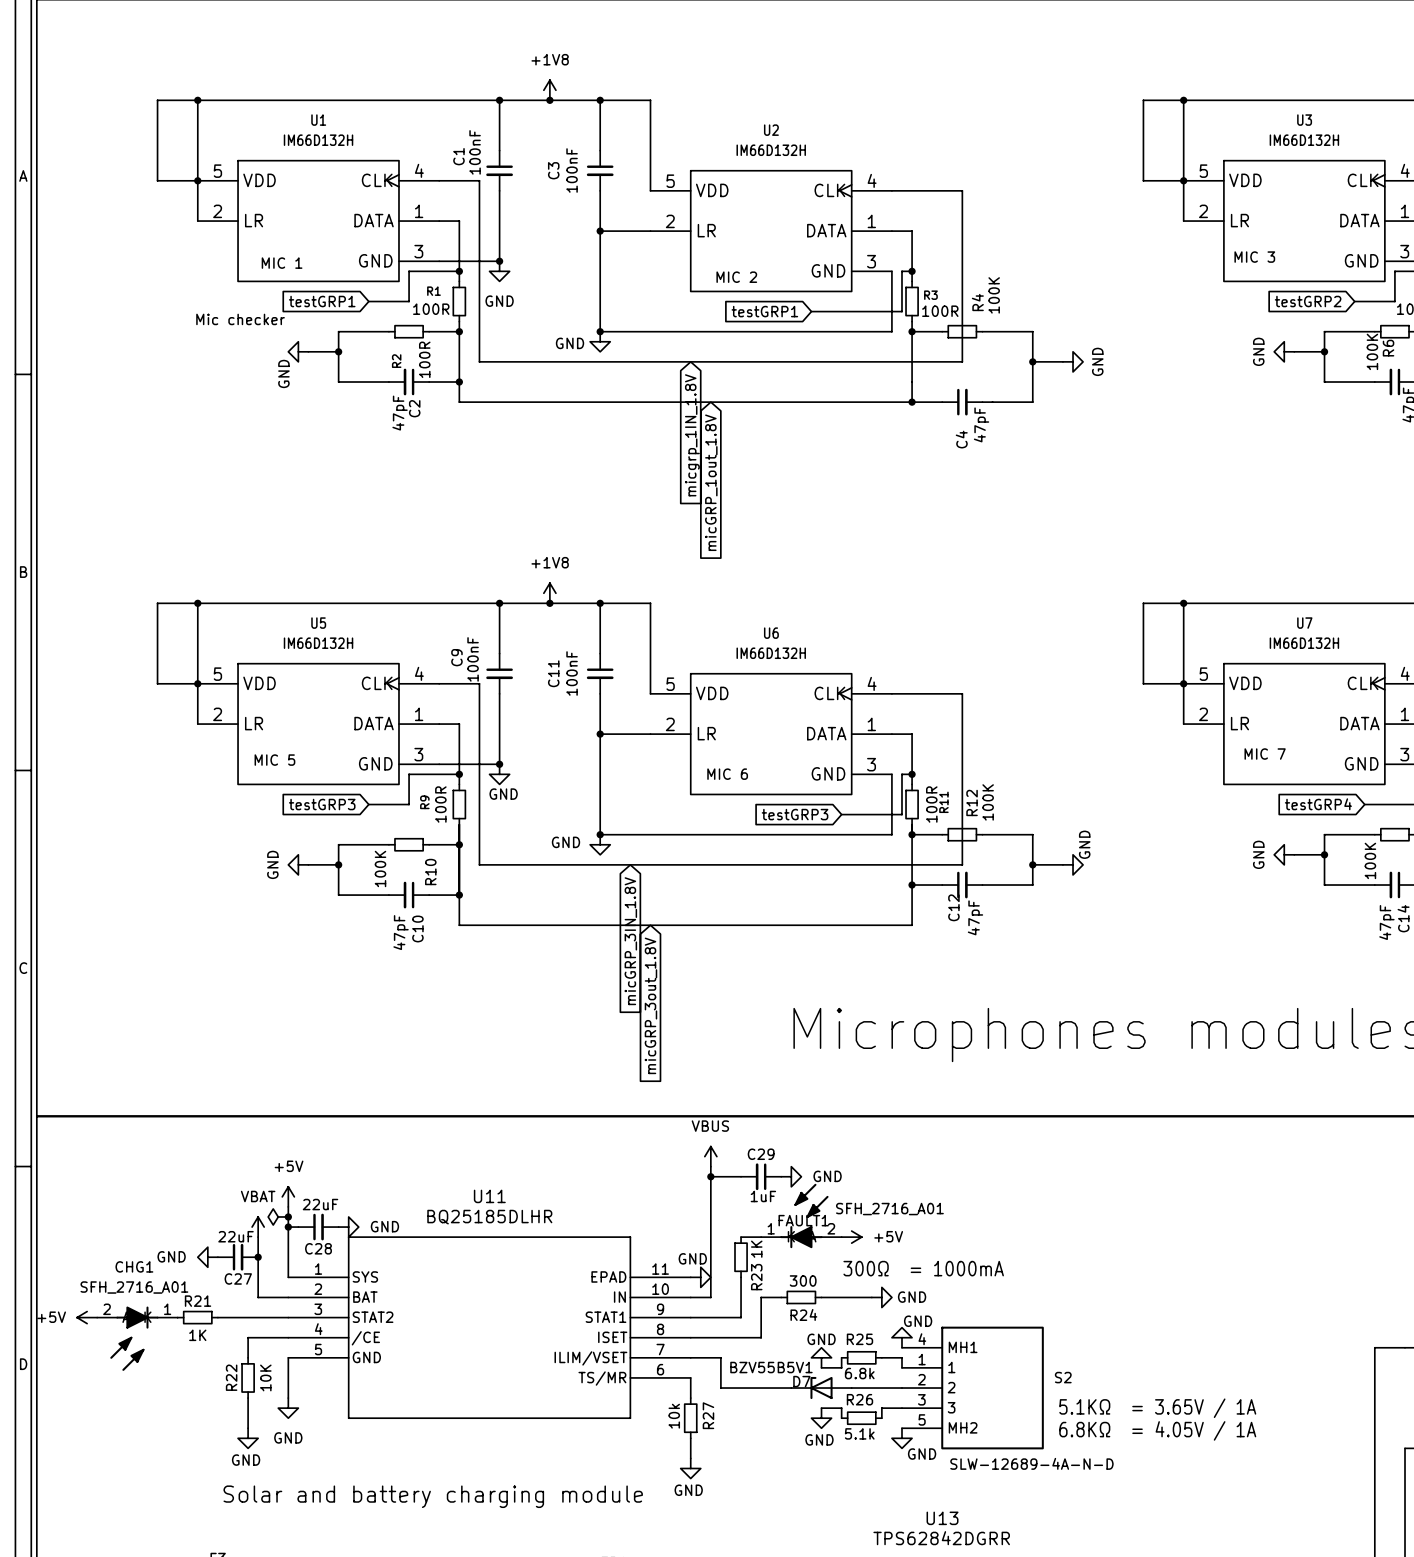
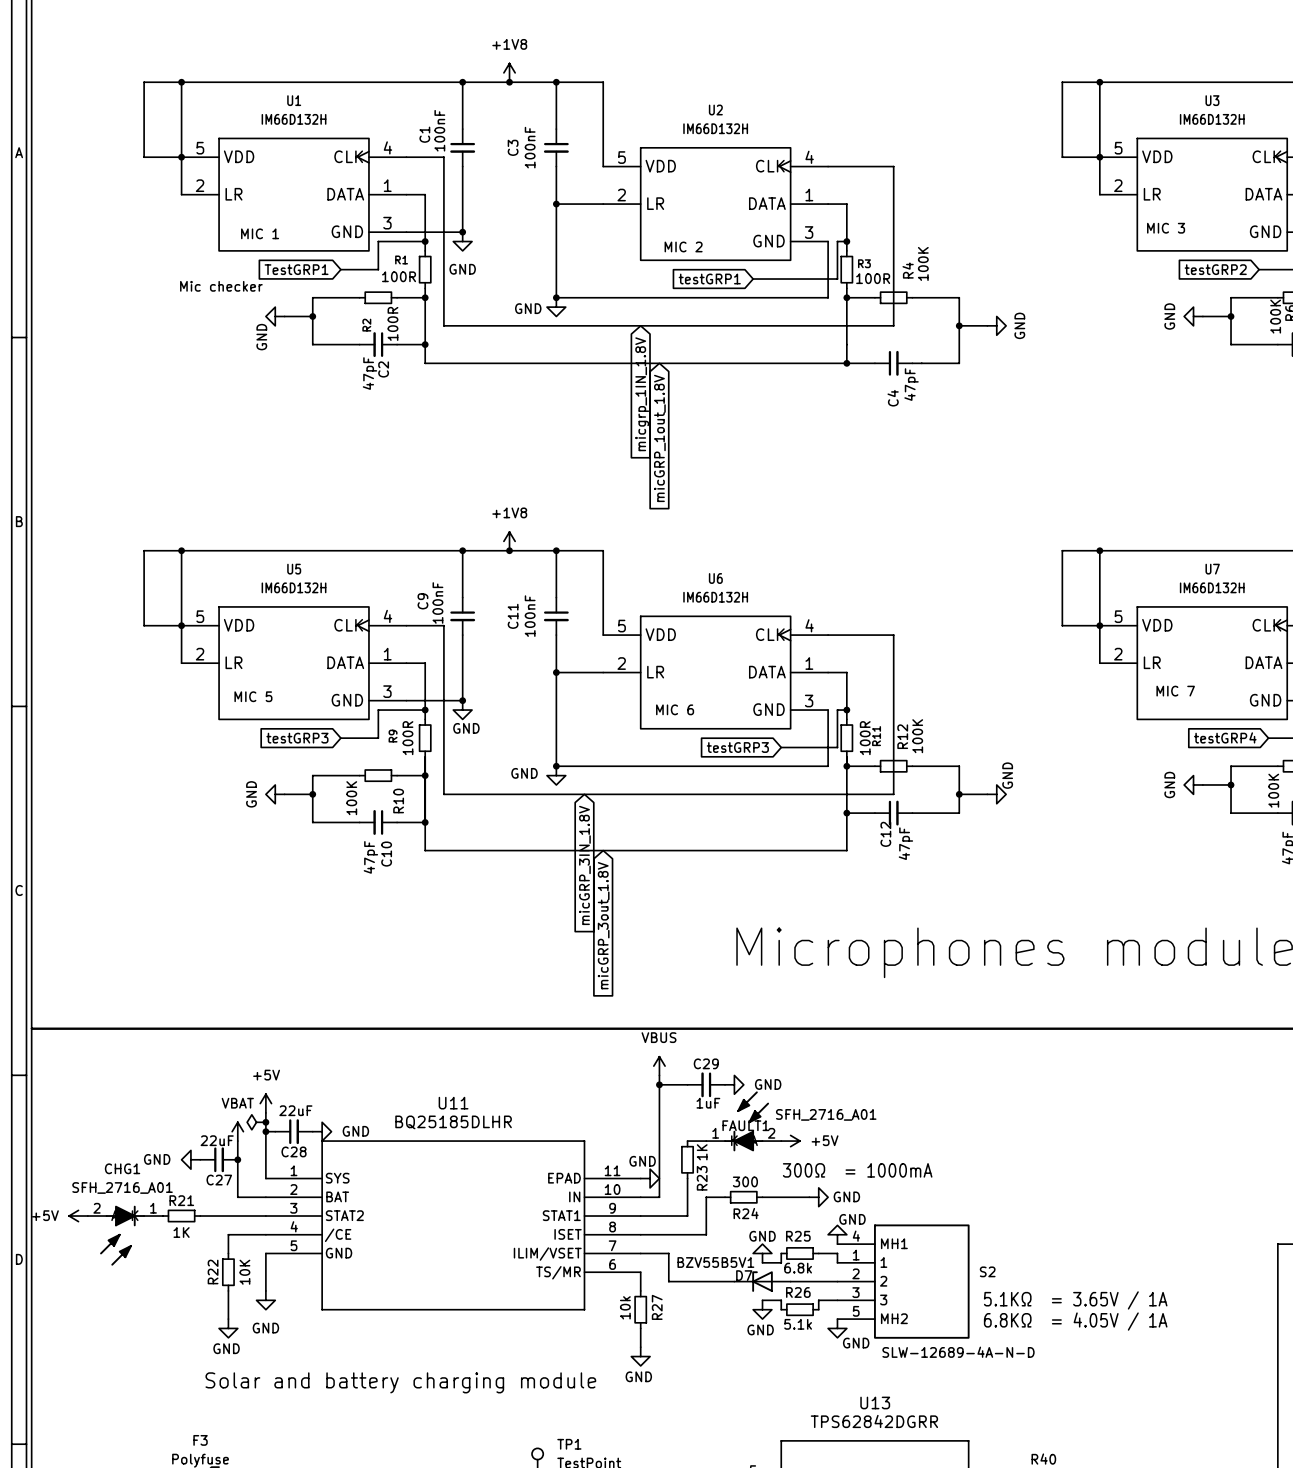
global label: testGRP1 (322, 301) -> TestGRP1 (296, 269)

